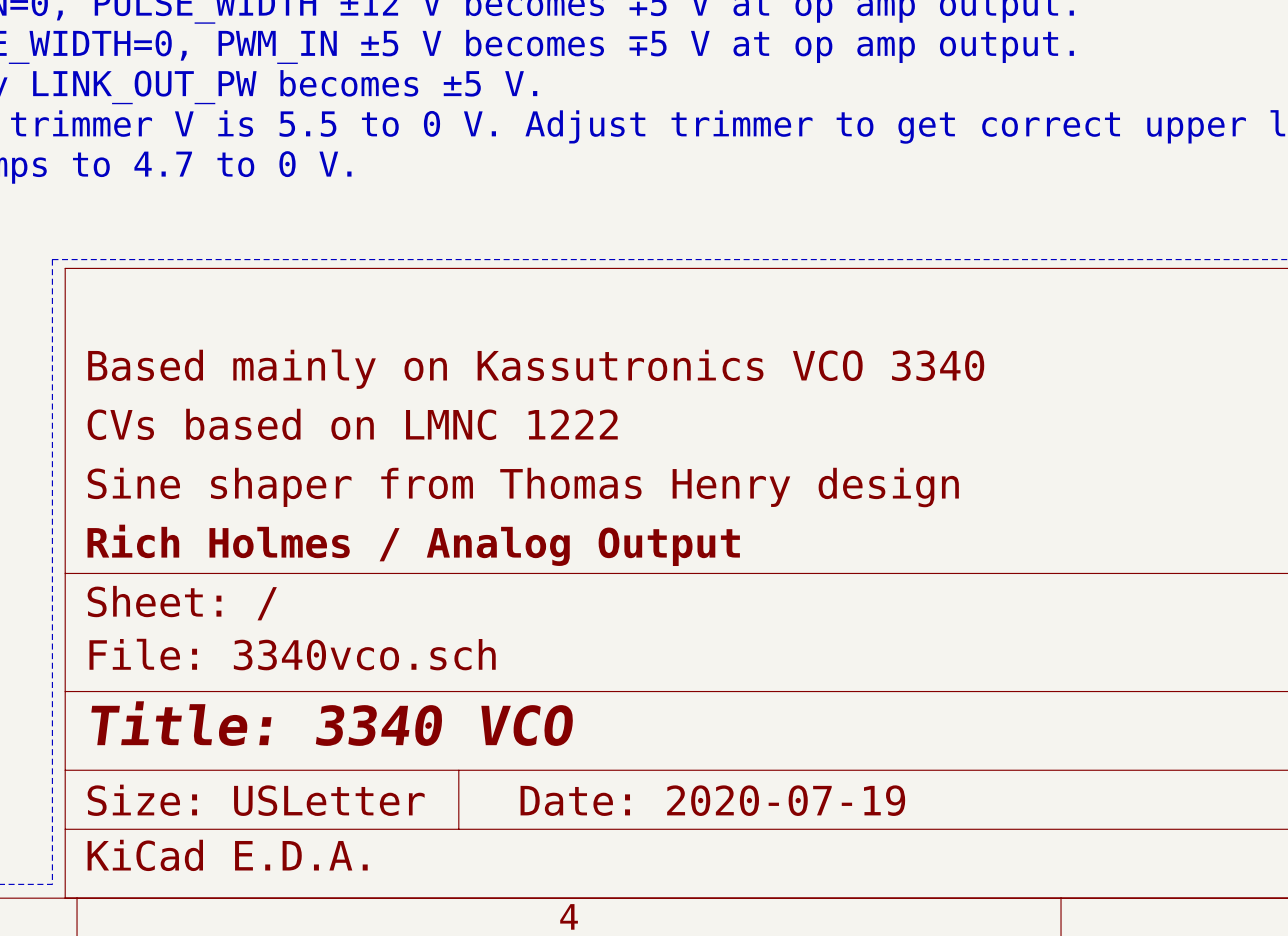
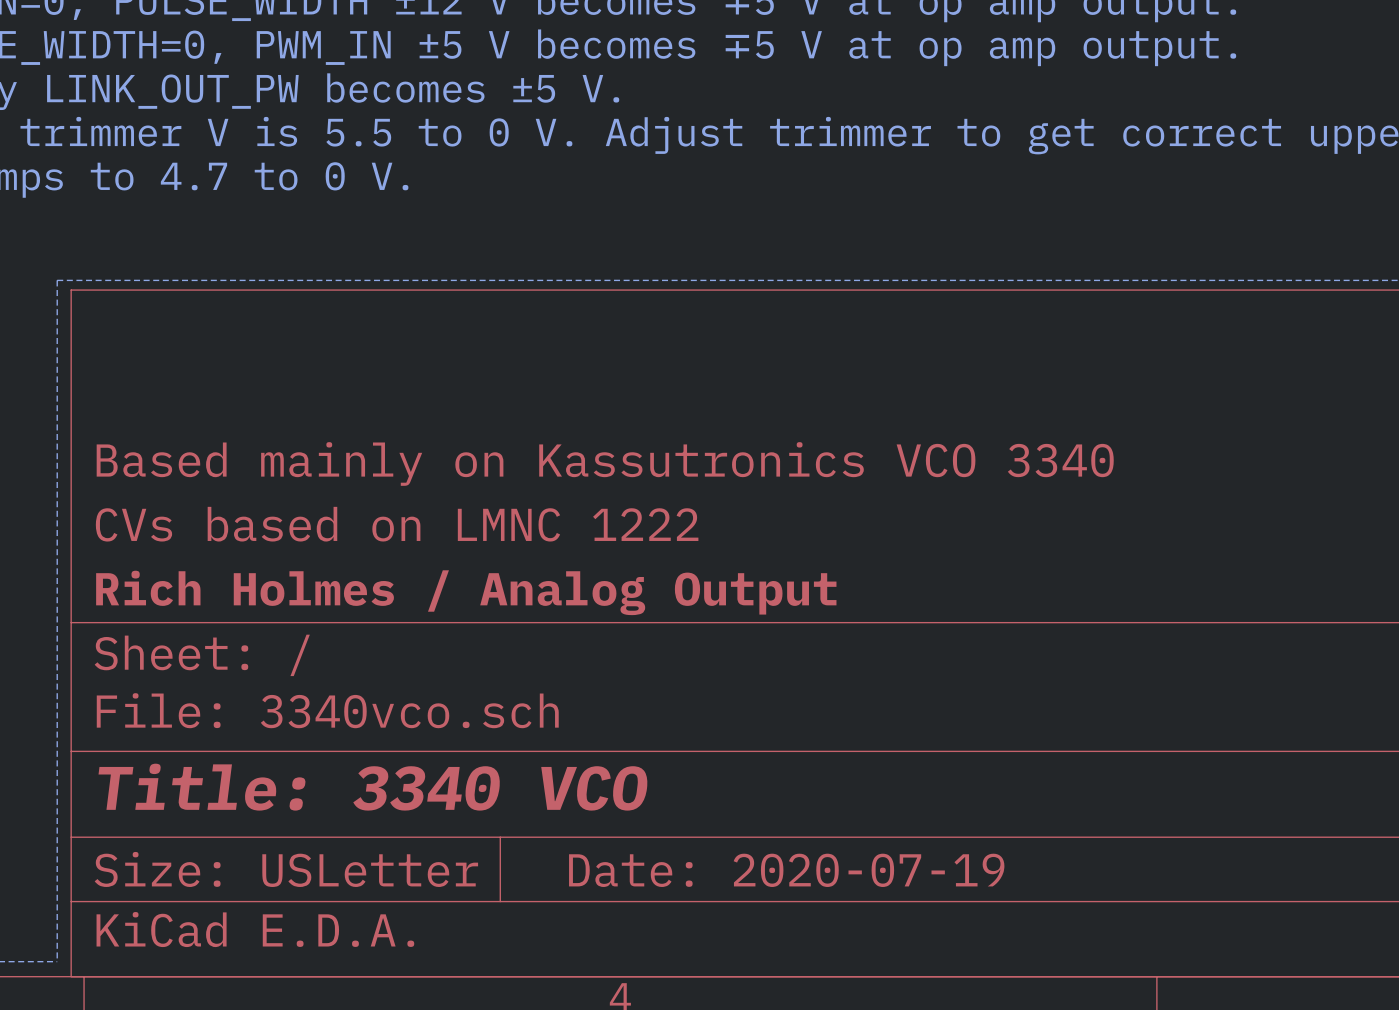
title block: Based mainly on Kassutronics VCO 3340 (536, 369) -> none
title block: CVs based on LMNC 1222 (352, 424) -> Based mainly on Kassutronics VCO 3340 (605, 463)
title block: Sine shaper from Thomas Henry design (523, 487) -> CVs based on LMNC 1222 (397, 524)

